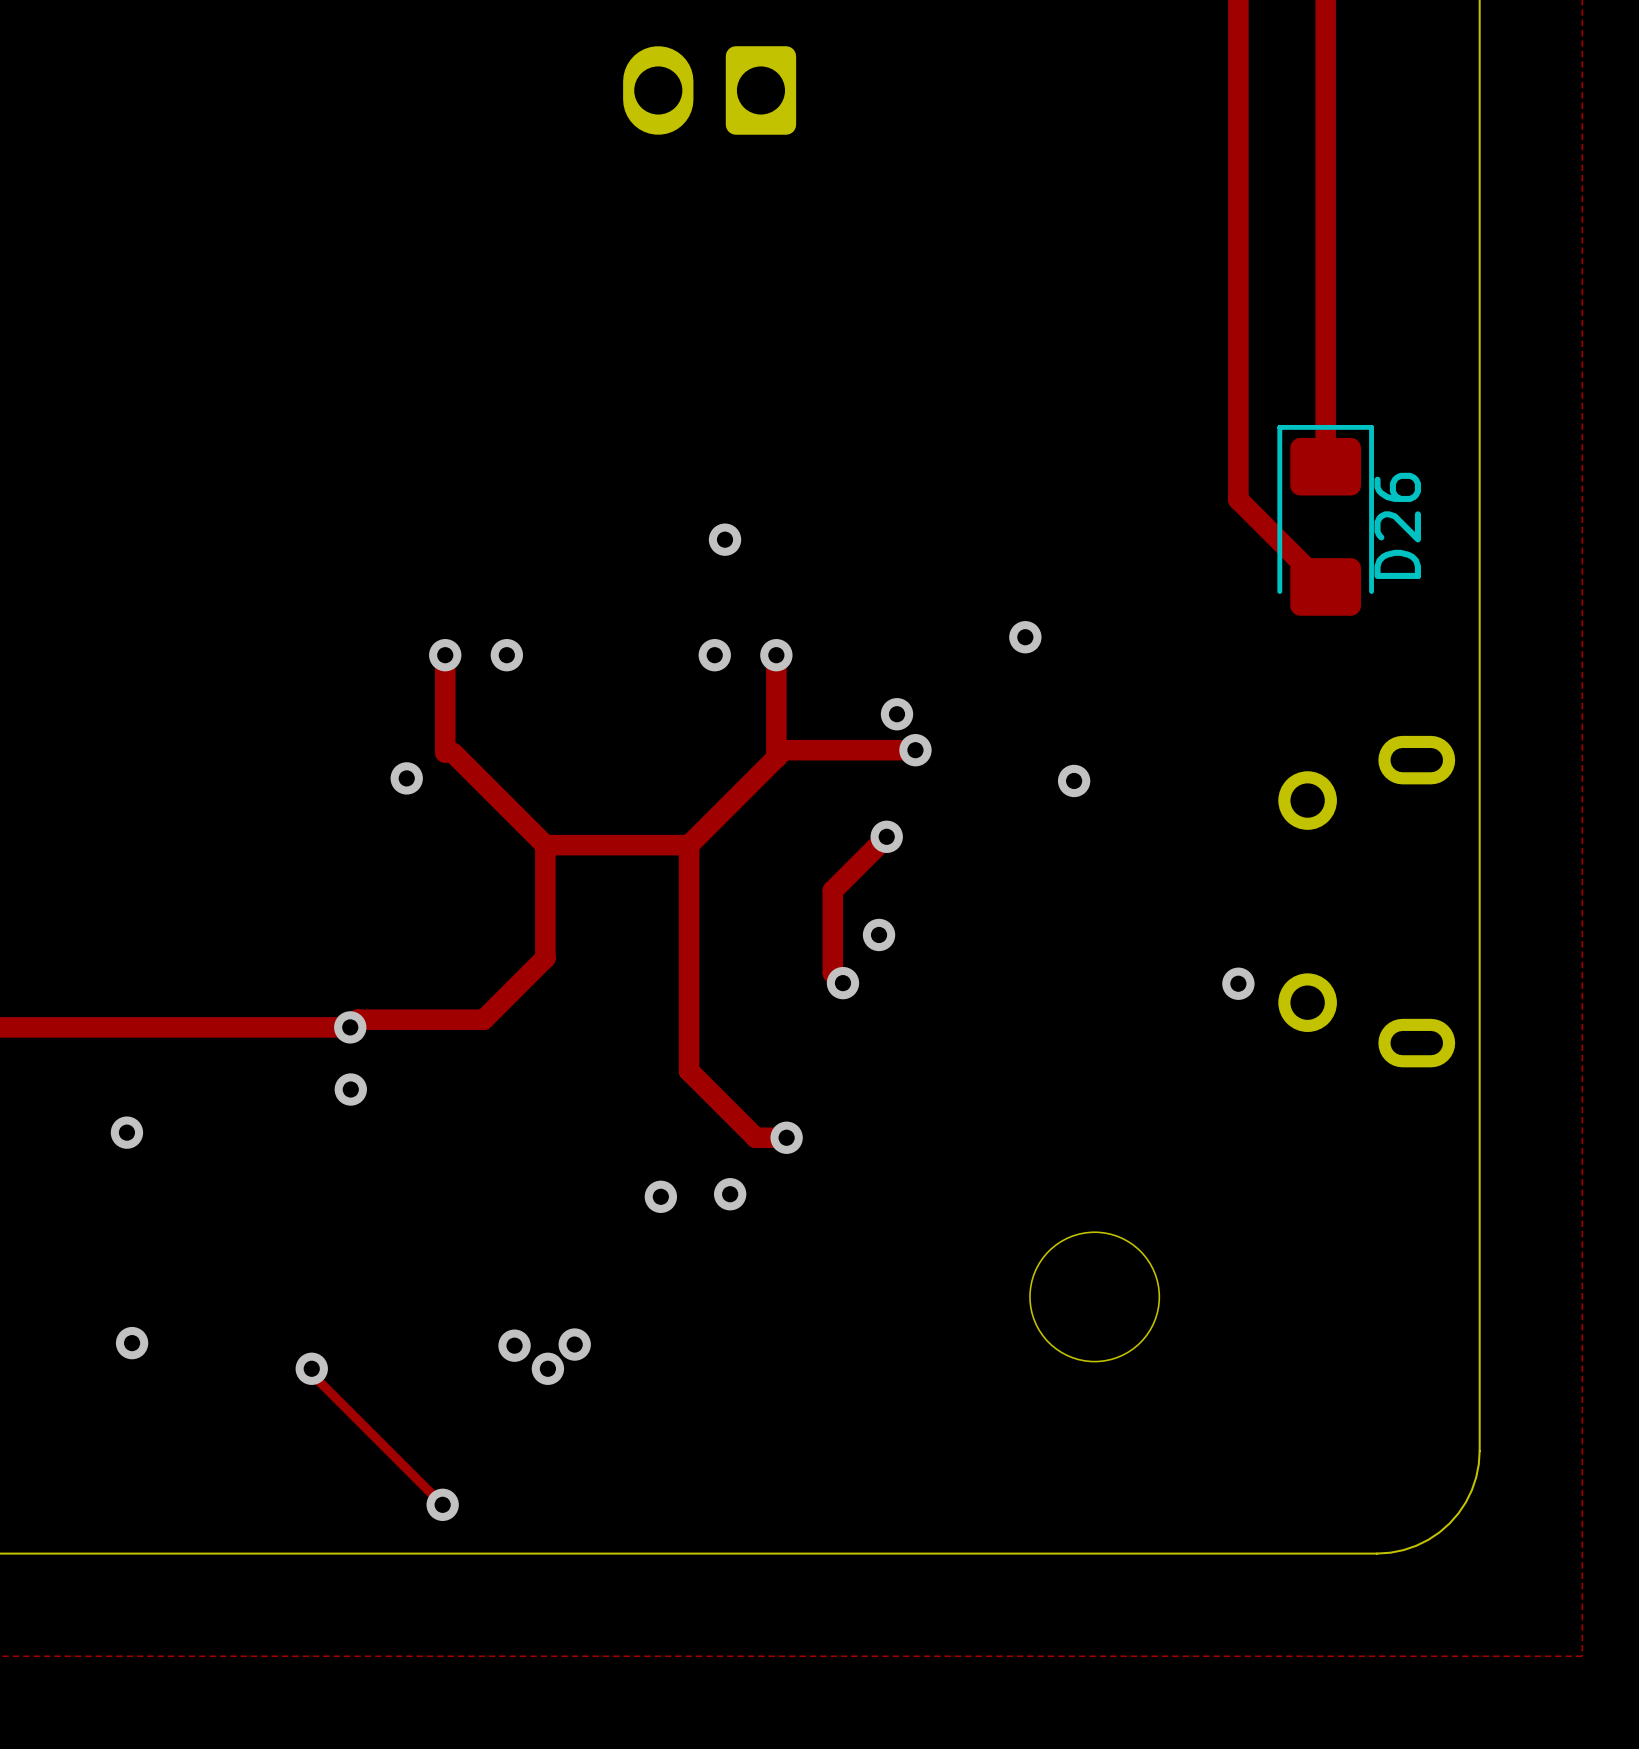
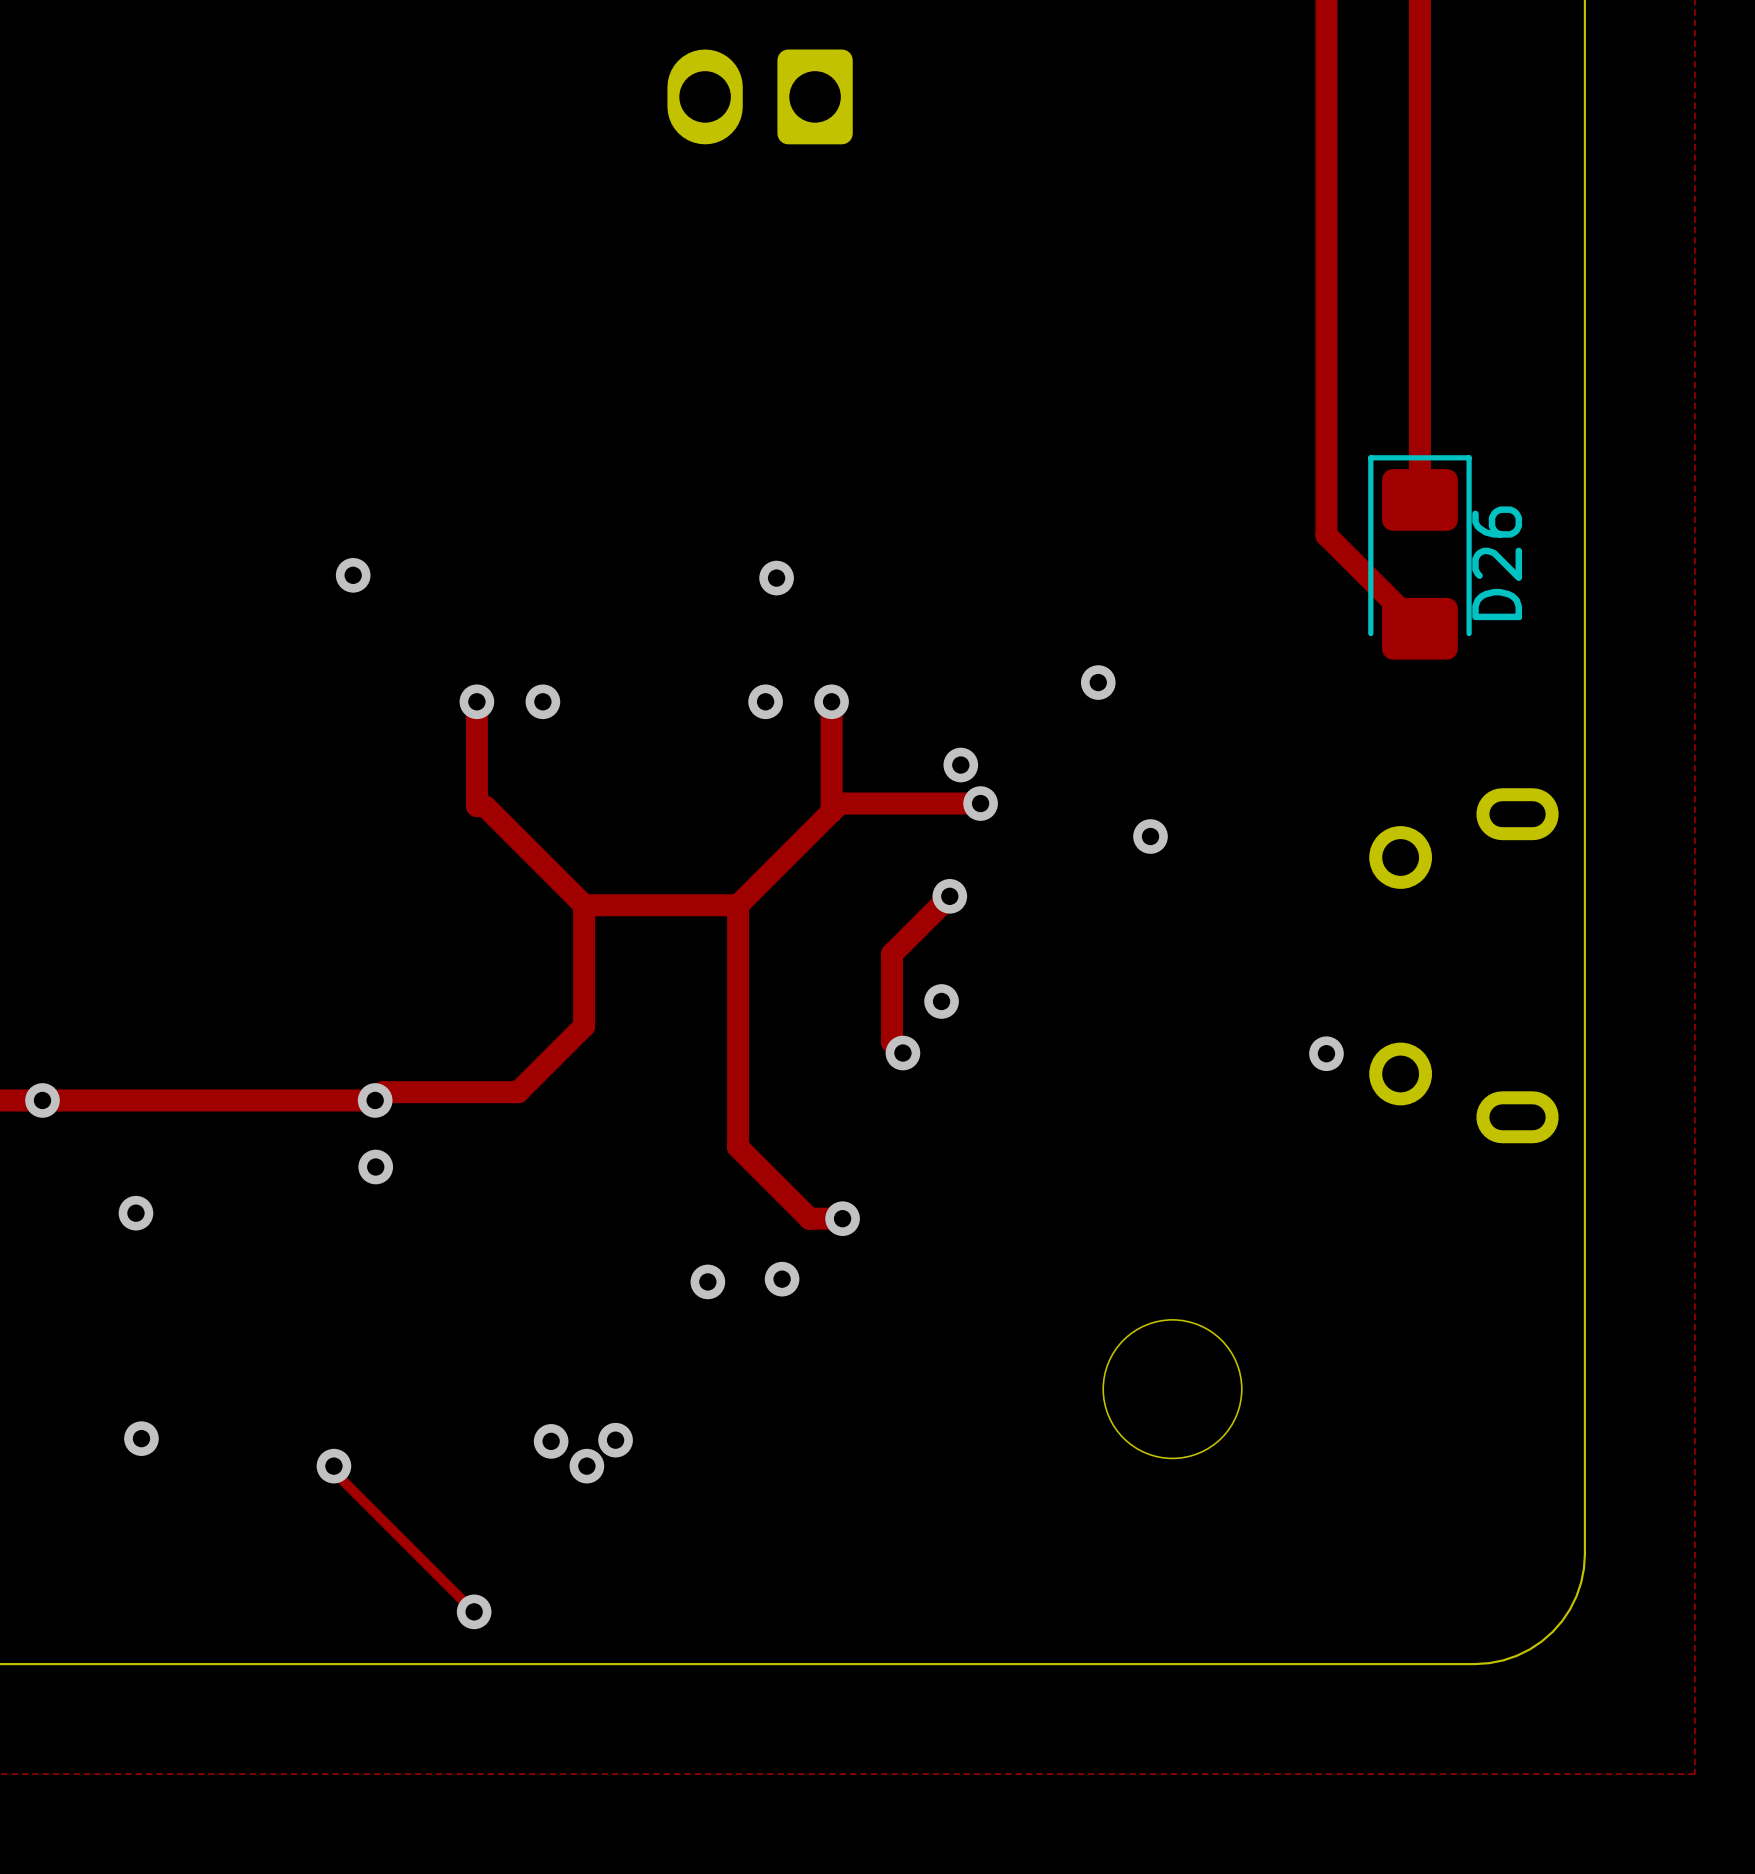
via: none -> (353, 575)
via: (406, 778) -> none
via: none -> (42, 1100)

